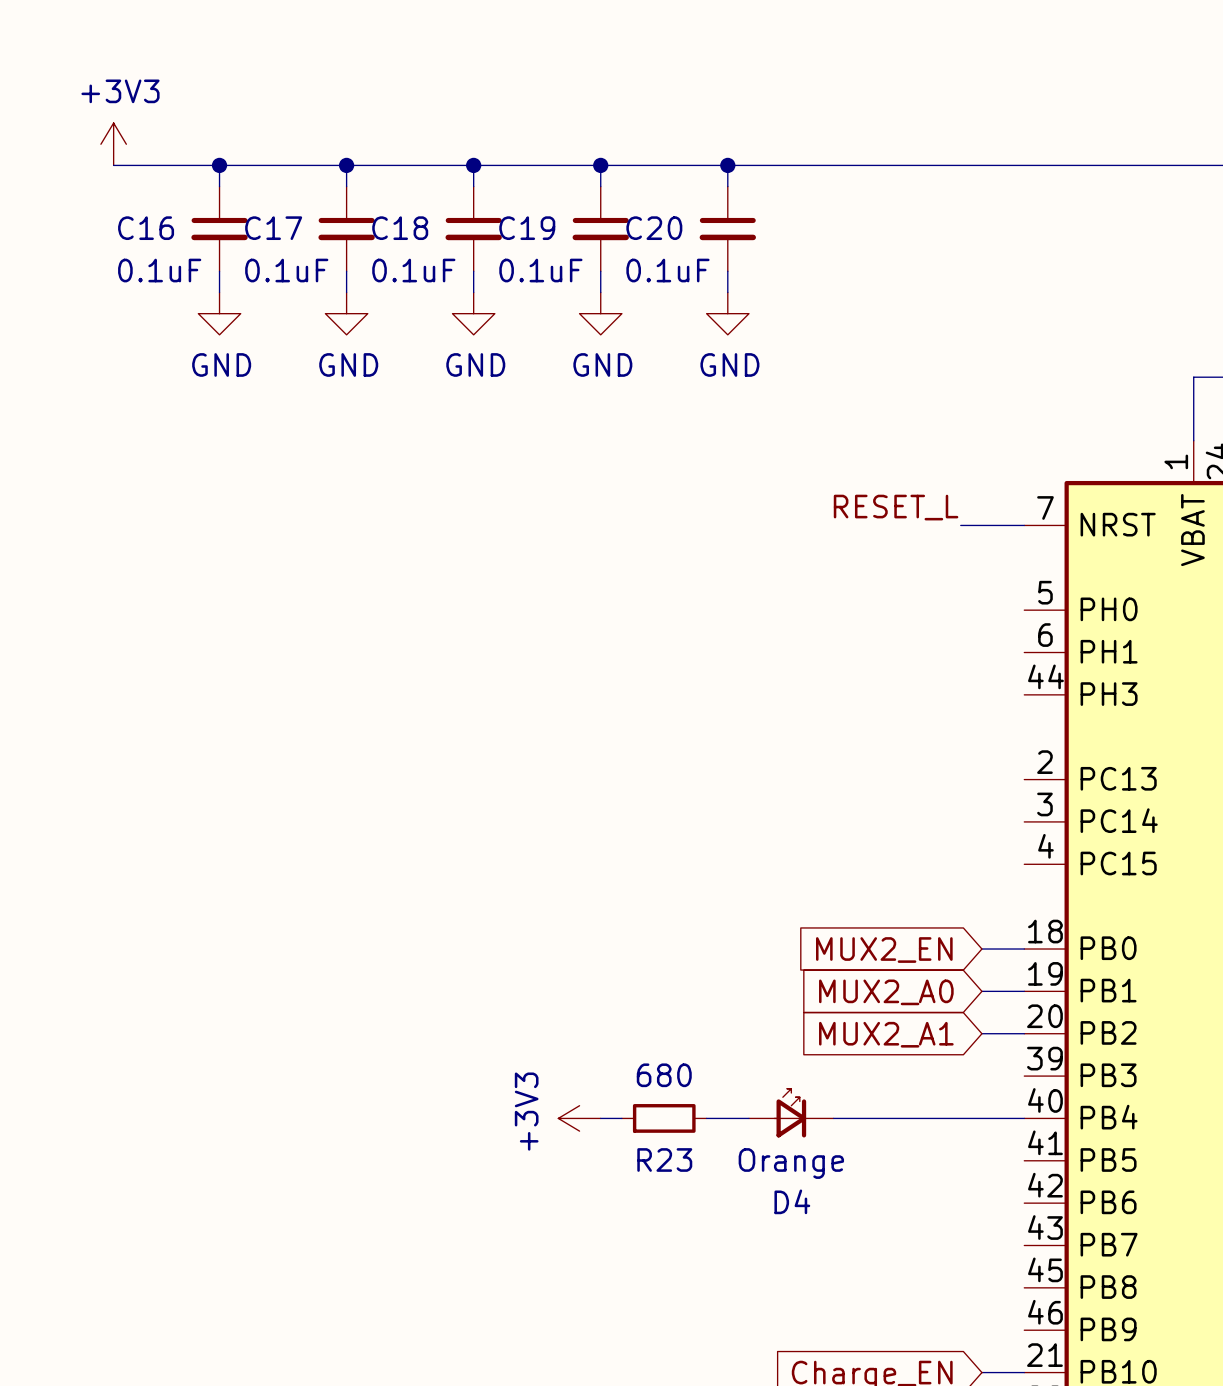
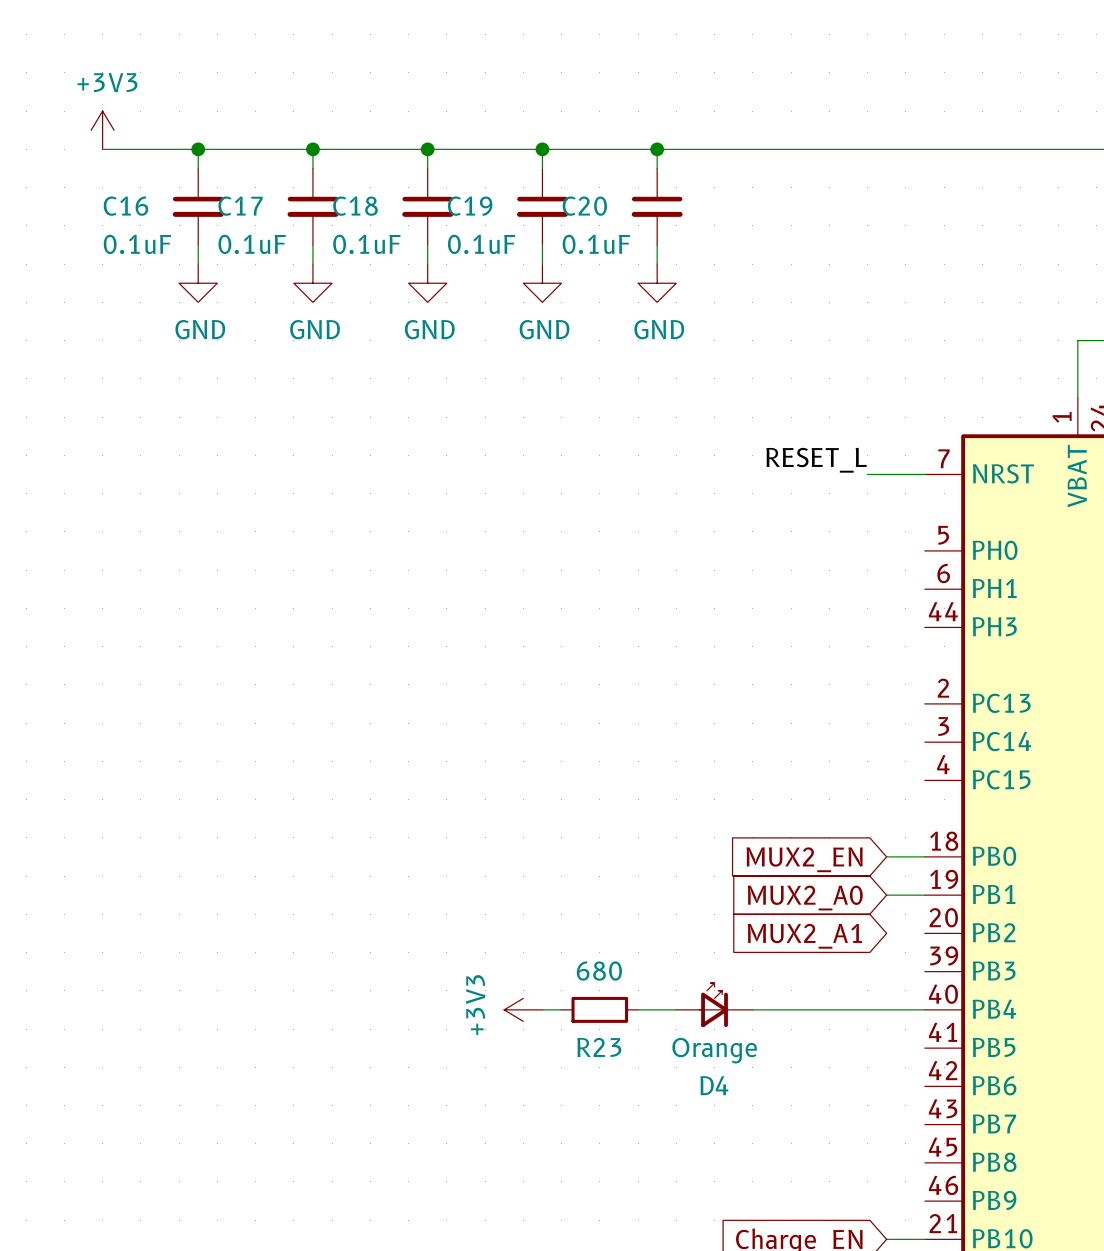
wire: (981, 1033) (1024, 1033) -> none

